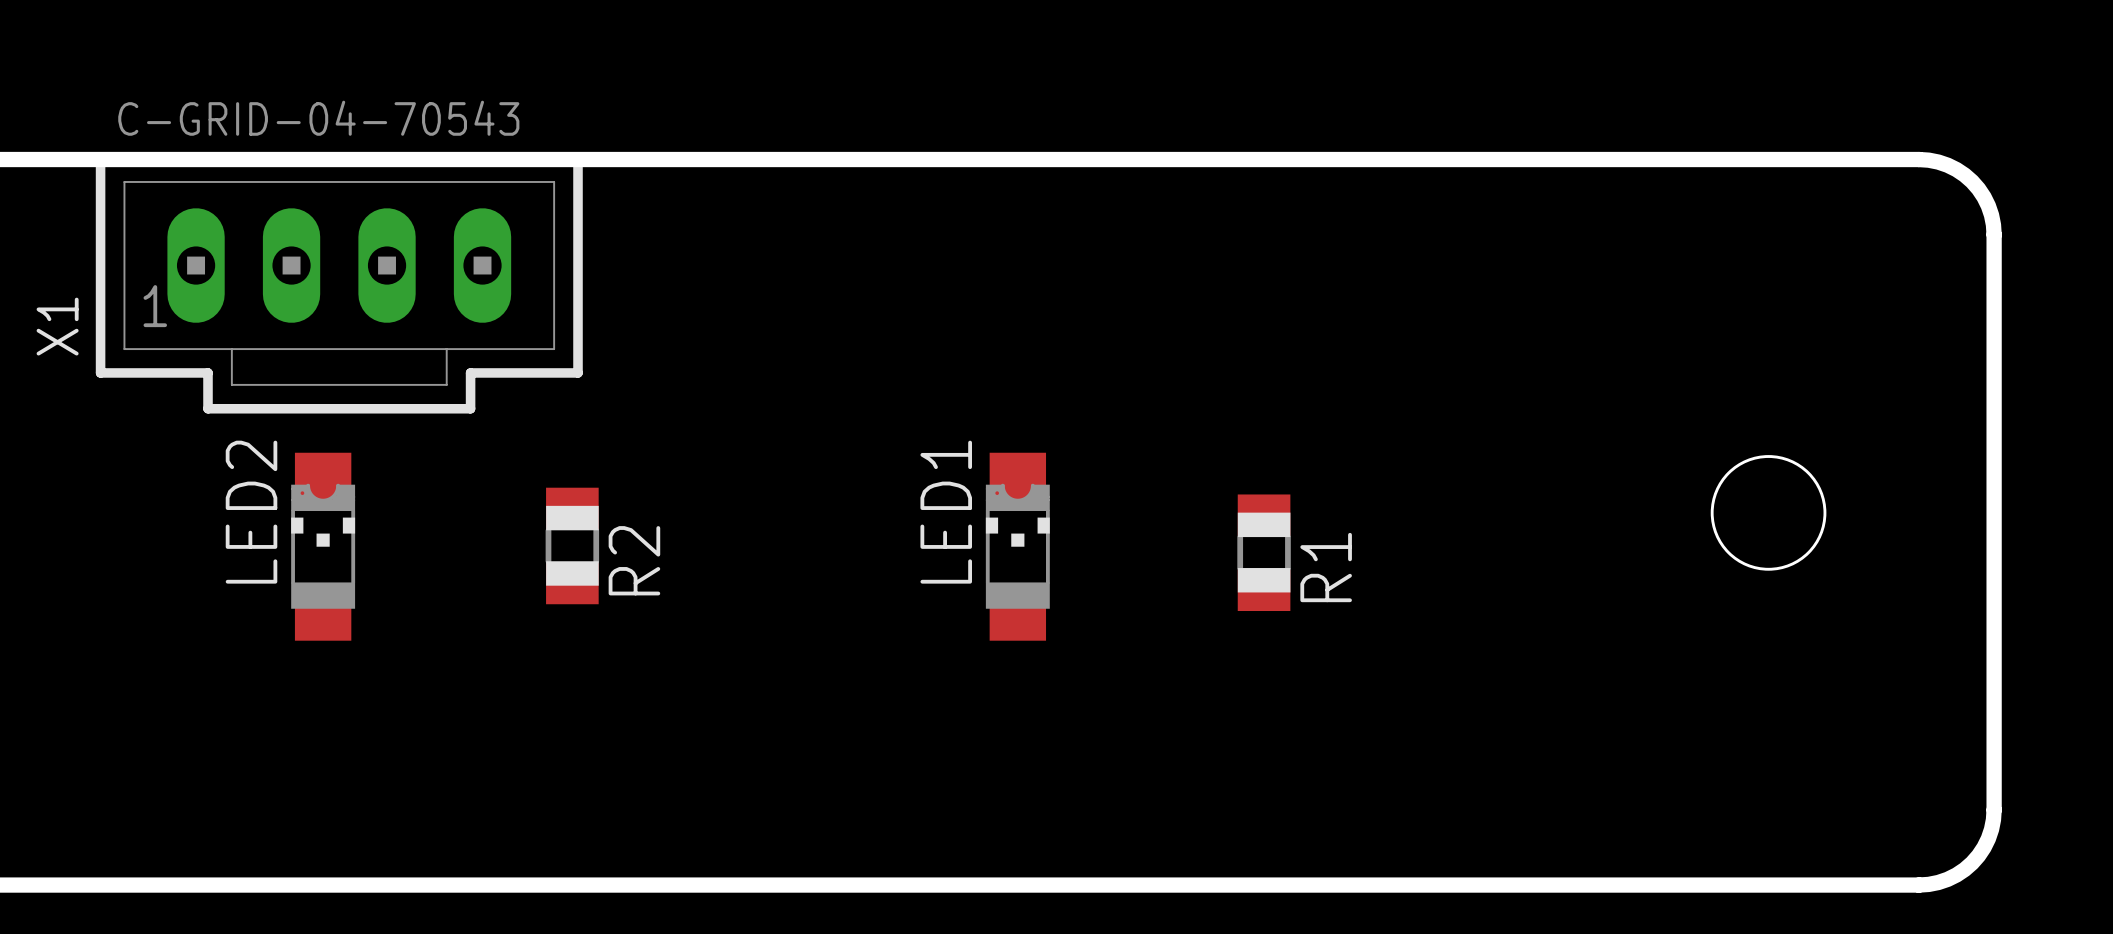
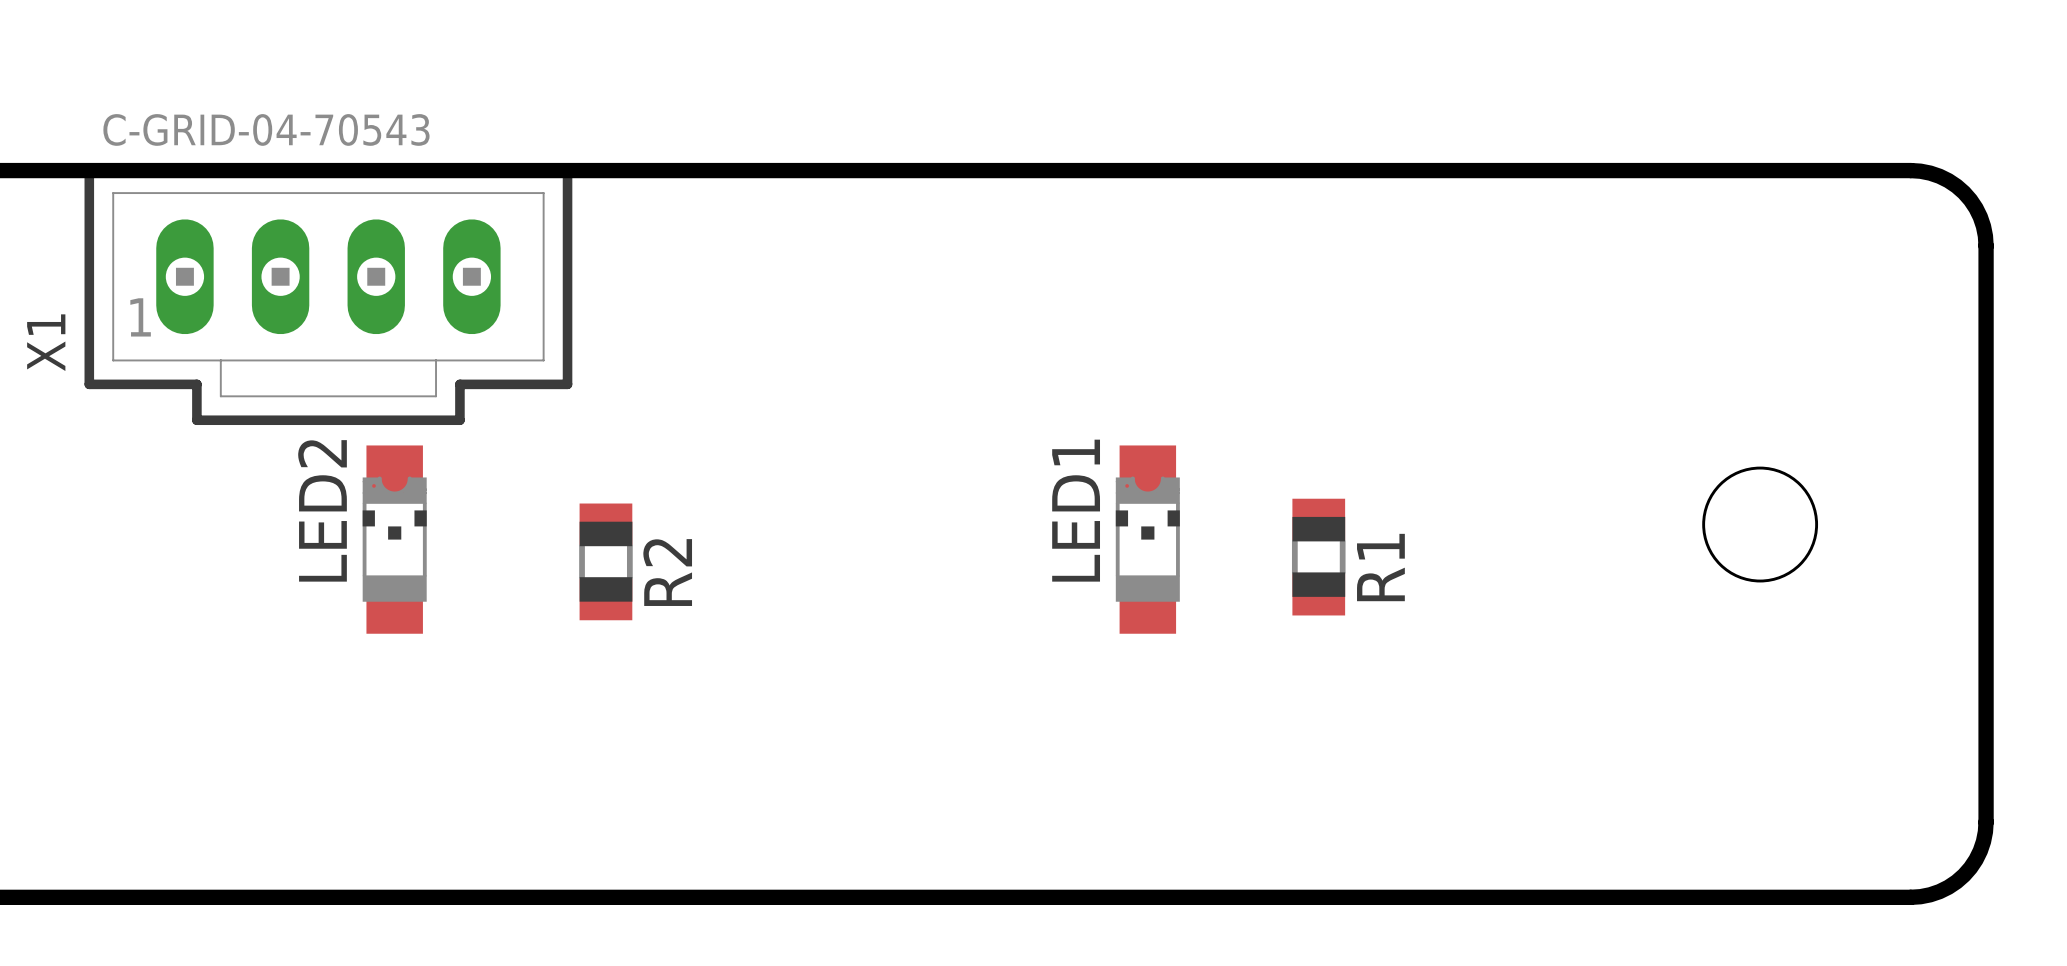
R2 position: (572, 545) -> (605, 561)
LED2 position: (323, 546) -> (394, 539)
LED1 position: (1017, 546) -> (1147, 539)
R1 position: (1264, 552) -> (1318, 557)

